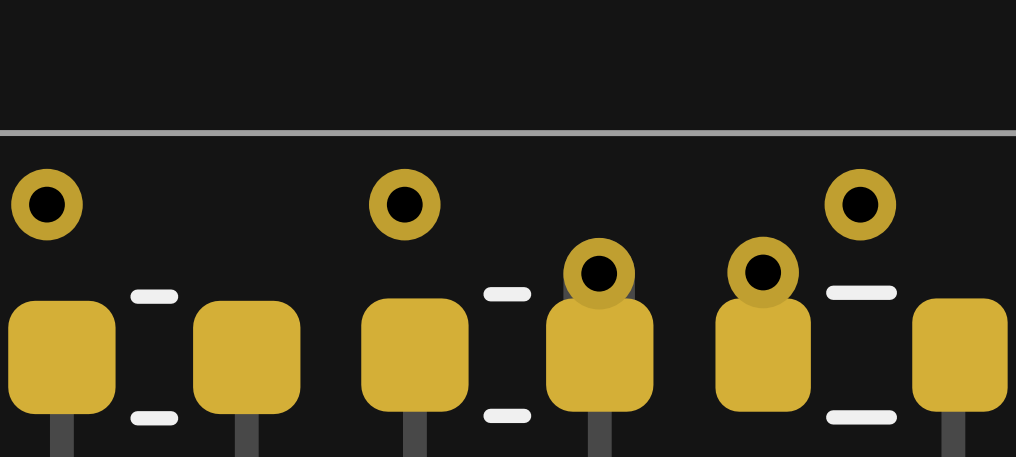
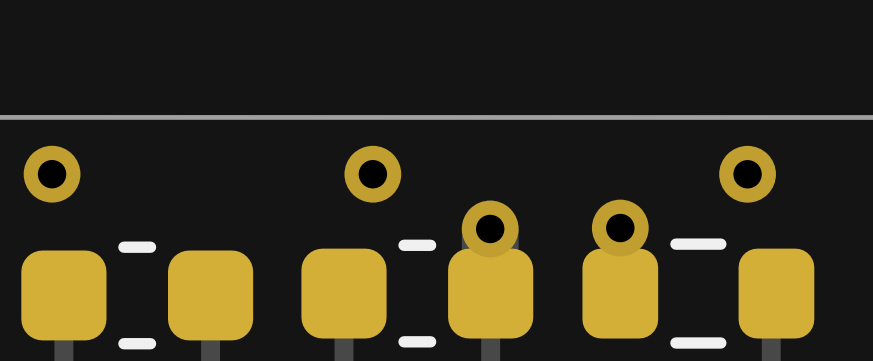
via position: (404, 204) -> (372, 174)
via position: (860, 204) -> (747, 174)

